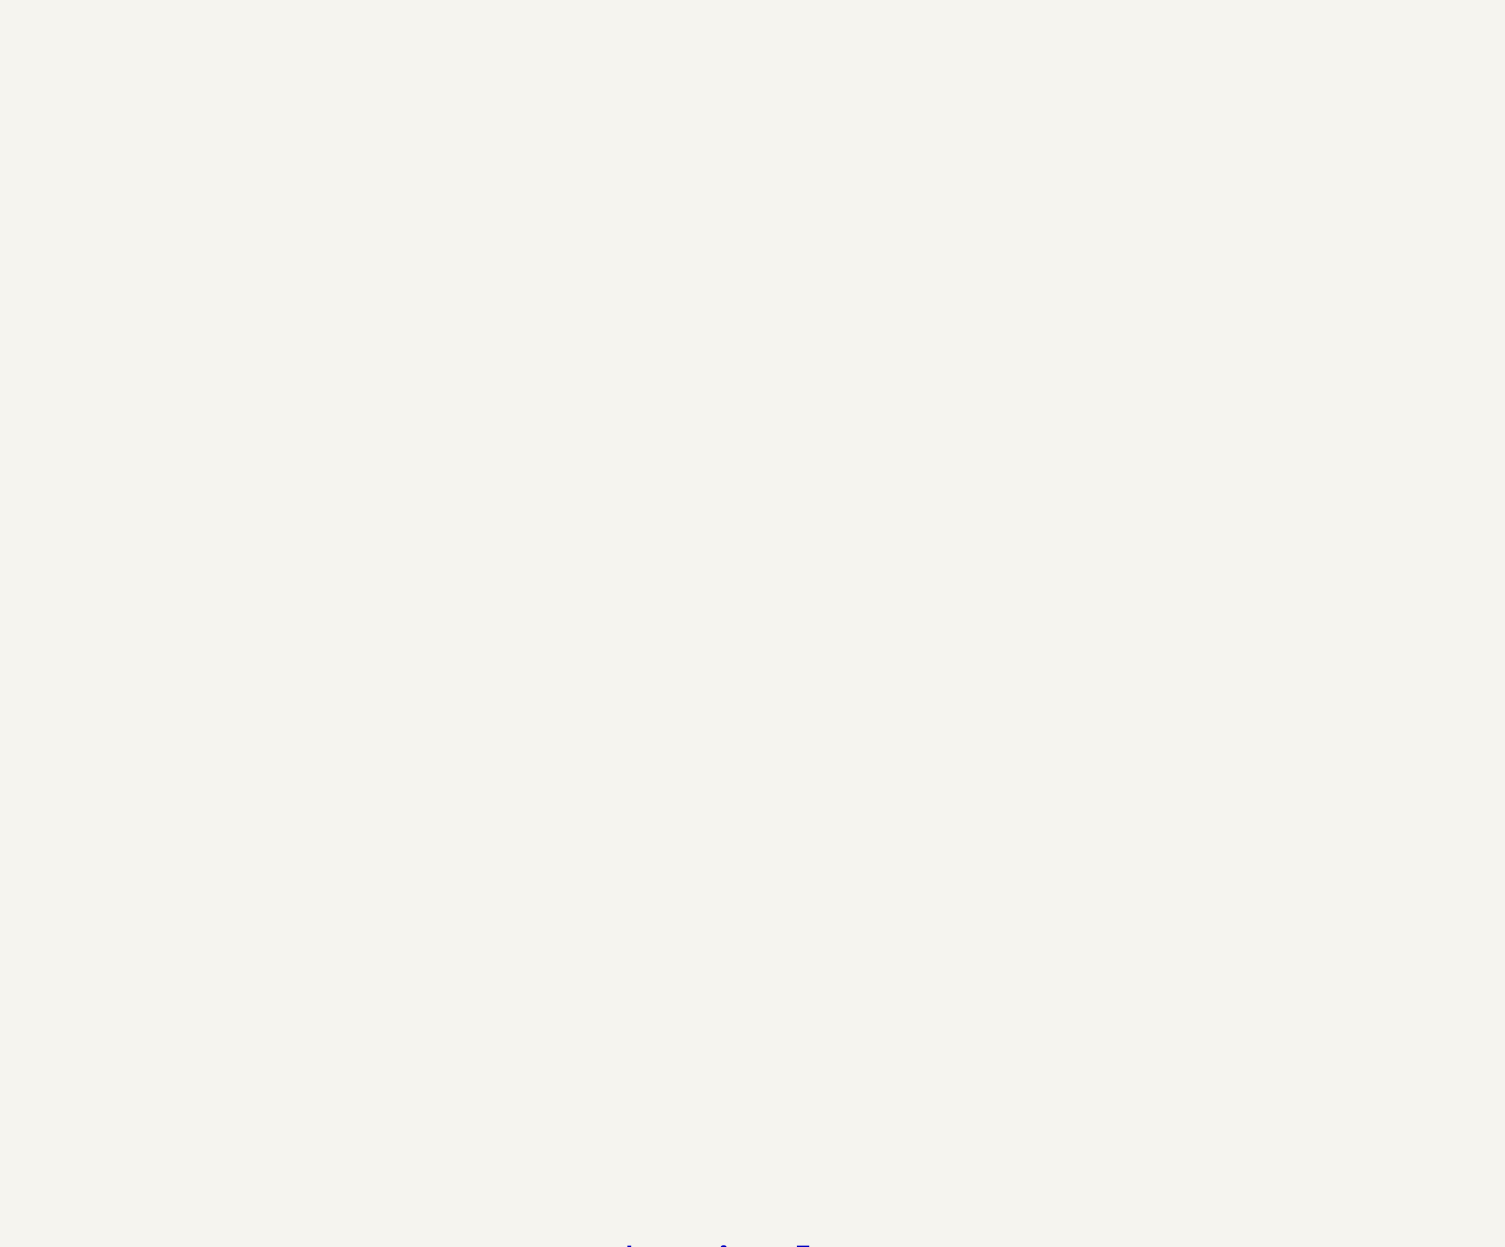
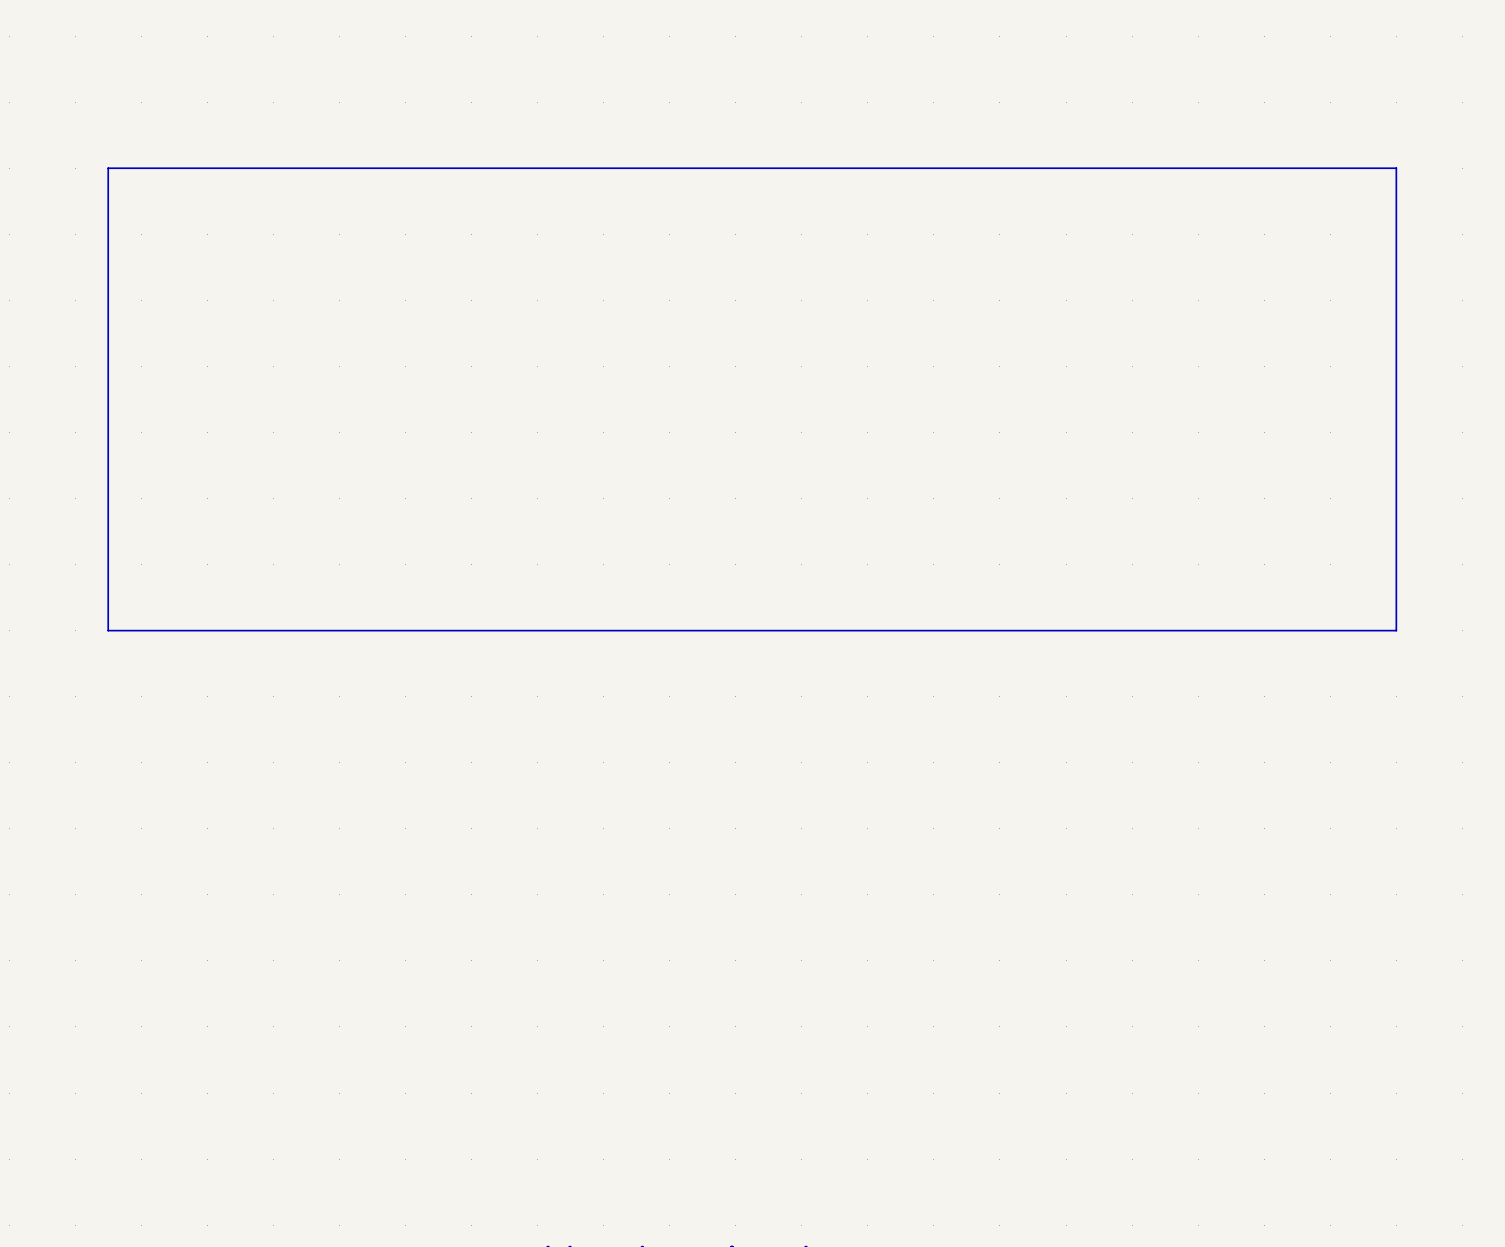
line: none -> (108, 168) (1396, 168) (1396, 630) (108, 630) (108, 168)

